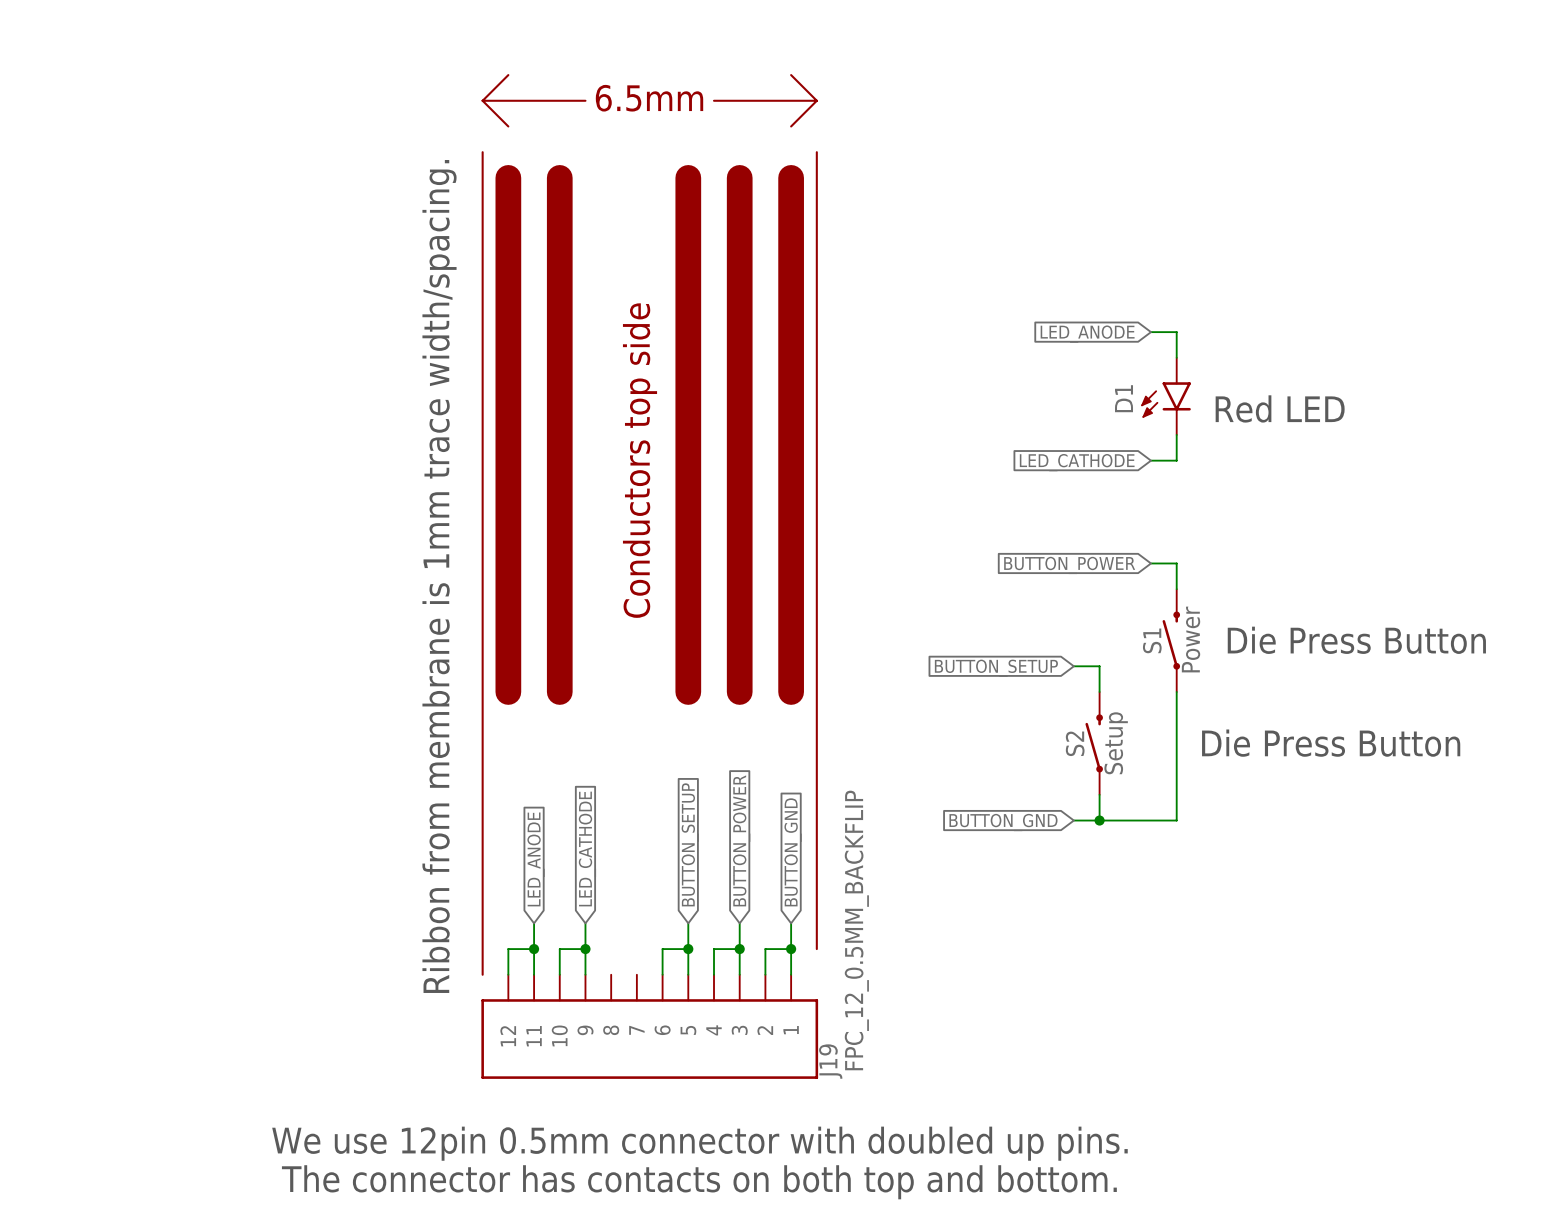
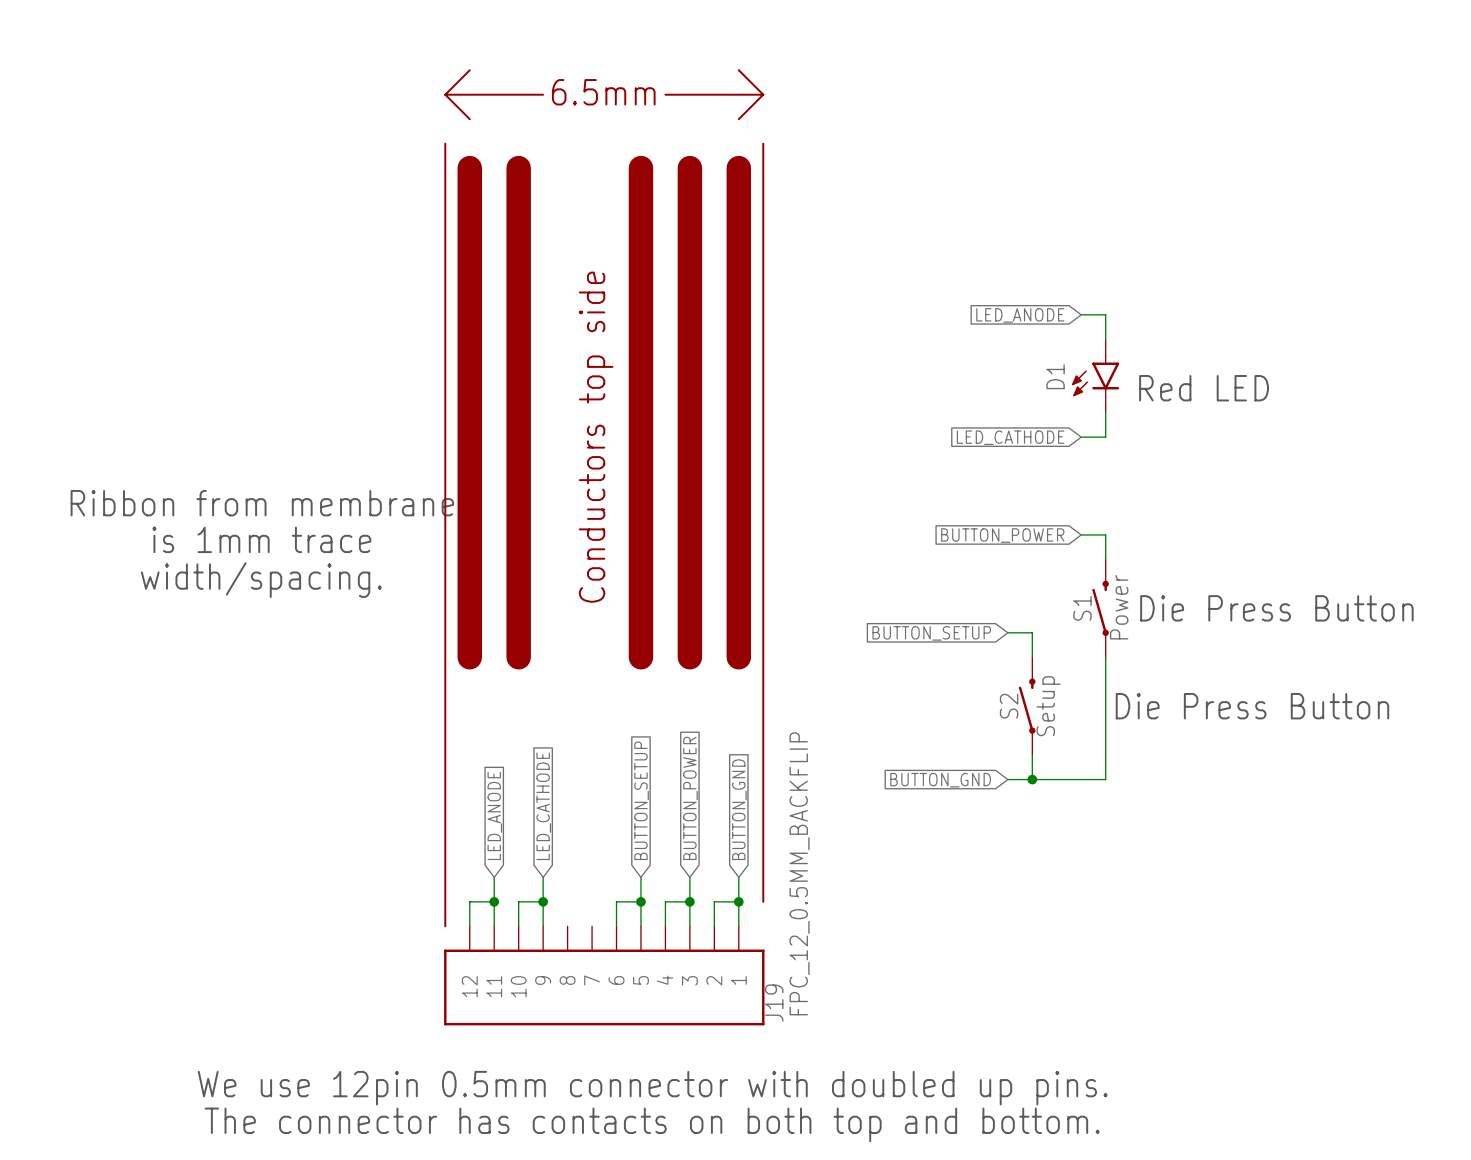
text: none -> Ribbon from membrane (262, 503)
text: none -> is 1mm trace (261, 539)
text: Ribbon from membrane is 1mm trace width/spacing. (439, 576) -> none
text: none -> width/spacing. (261, 580)

